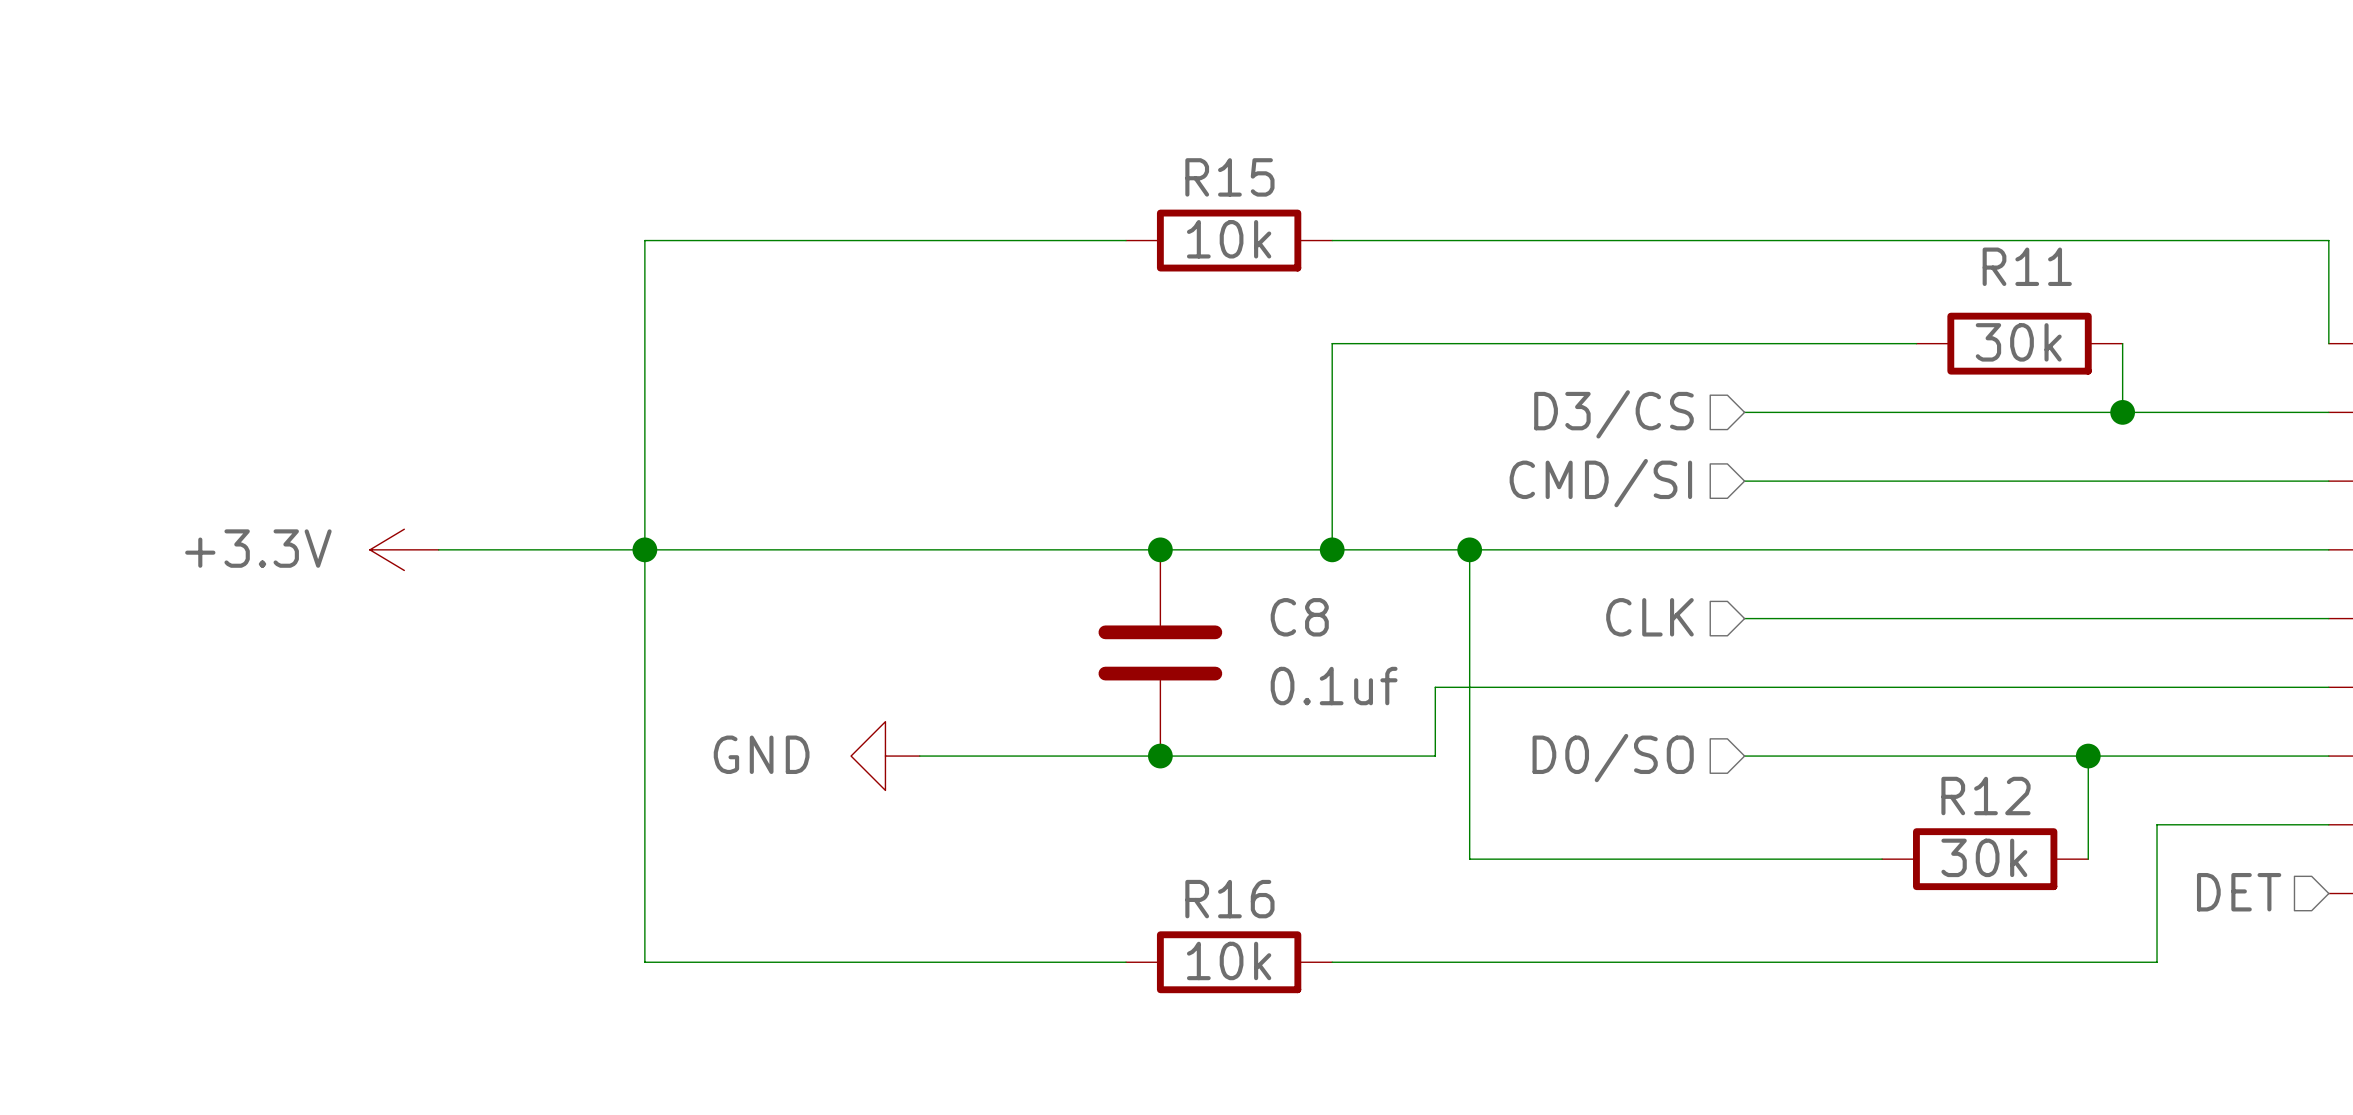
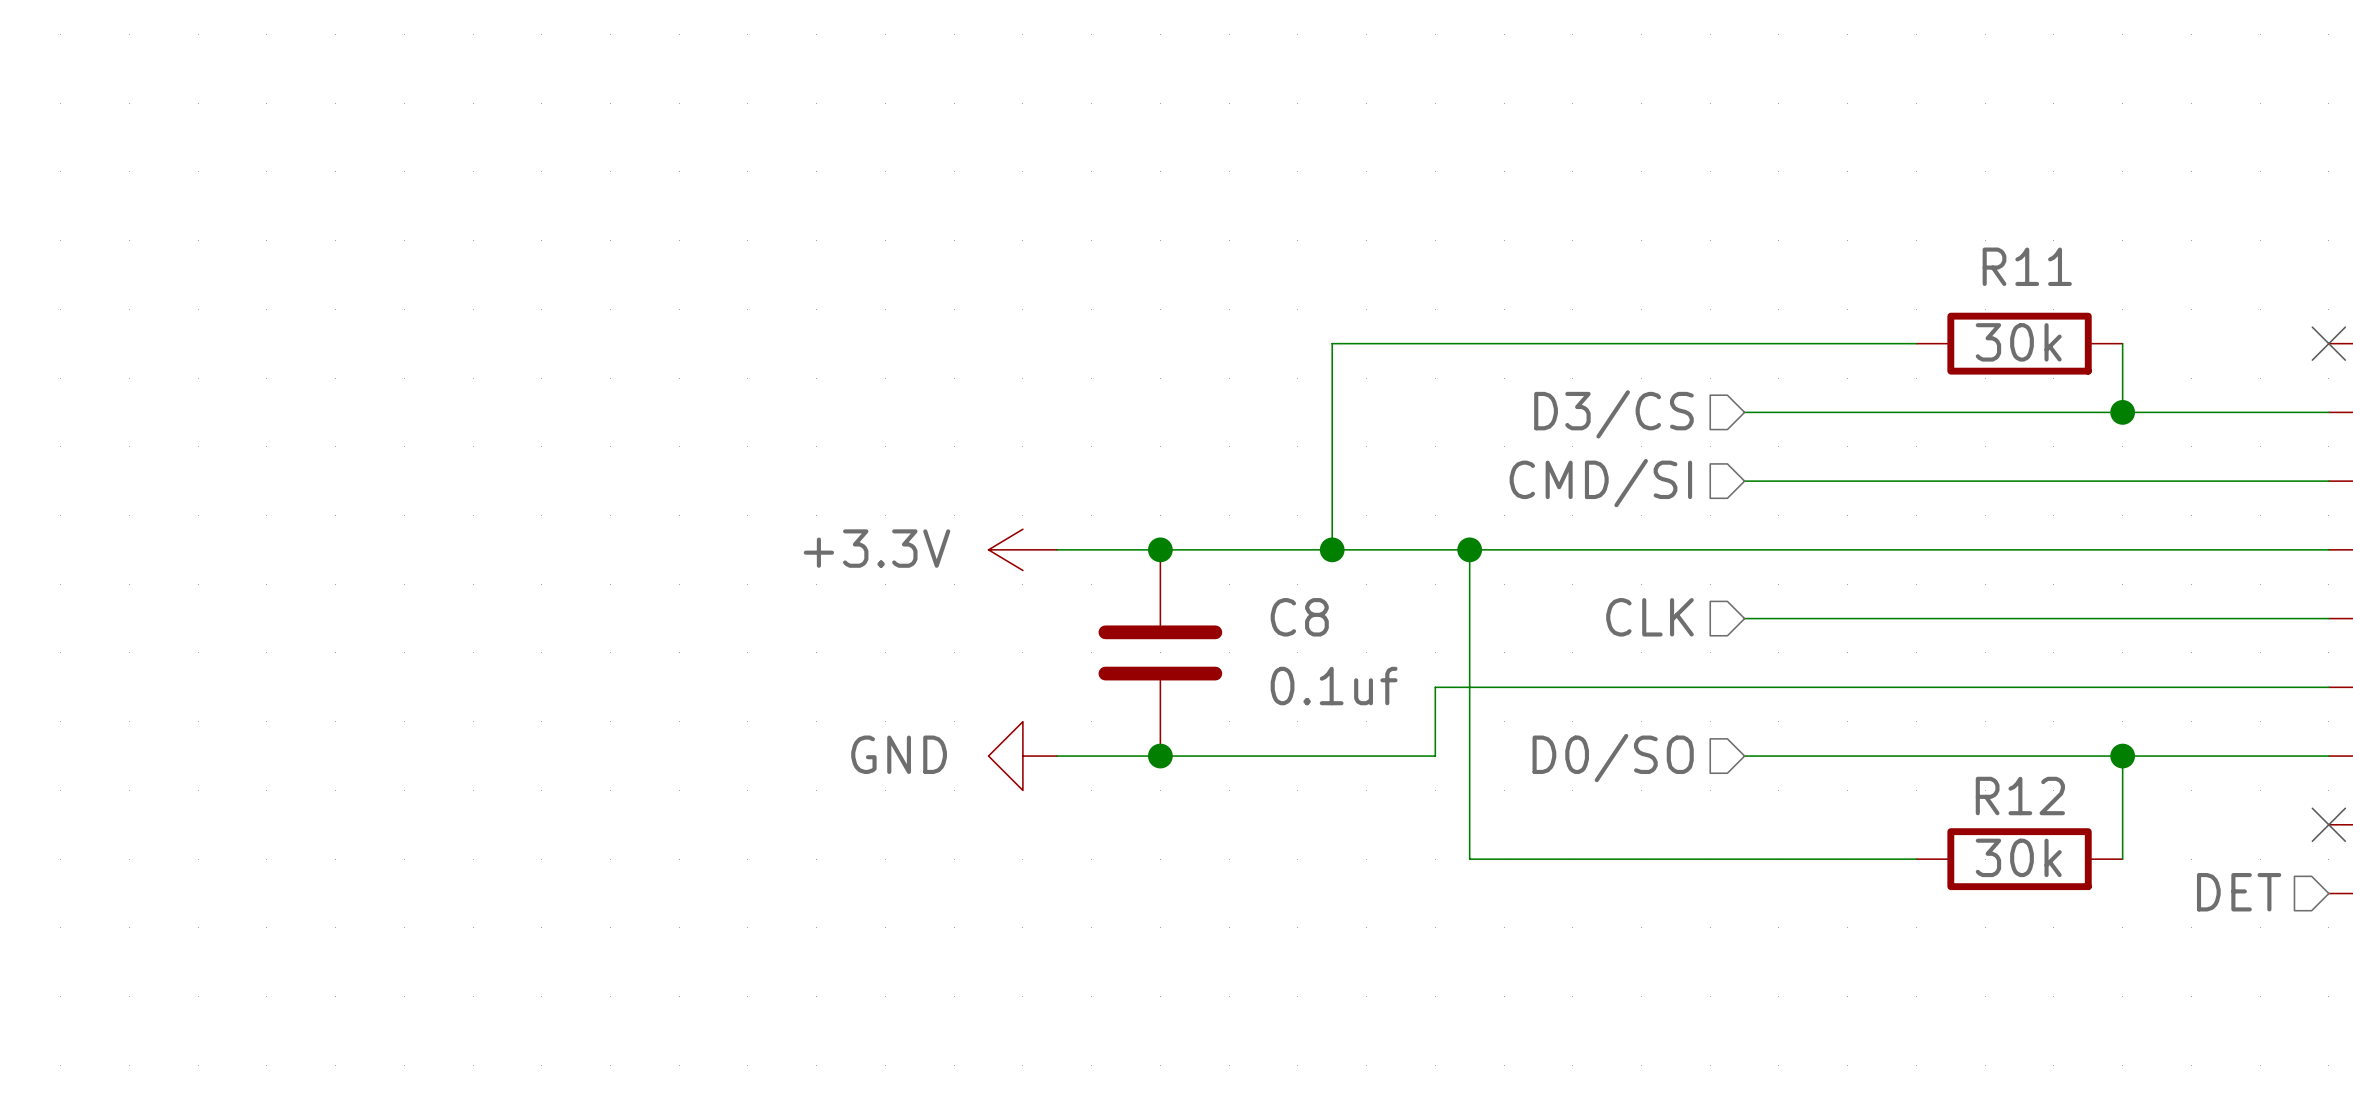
wire: (1126, 240) (644, 240) (644, 962) (1126, 962) -> none
R15: 10k (1229, 240) -> none
wire: (1332, 240) (2328, 240) (2328, 343) -> none
no-connect mark: none -> (2328, 343)
power symbol position: +3.3V (404, 549) -> +3.3V (1022, 549)
wire: (438, 549) (1057, 549) -> none
junction: (644, 549) -> none
power symbol position: GND (885, 756) -> GND (1022, 756)
wire: (919, 756) (1057, 756) -> none
wire: (2088, 756) (2088, 859) -> (2122, 756) (2122, 859)
junction position: (2088, 756) -> (2122, 756)
wire: (2328, 824) (2157, 824) (2157, 962) (1332, 962) -> none
no-connect mark: none -> (2328, 824)
R12 position: (1985, 859) -> (2019, 859)
R16: 10k (1229, 962) -> none

